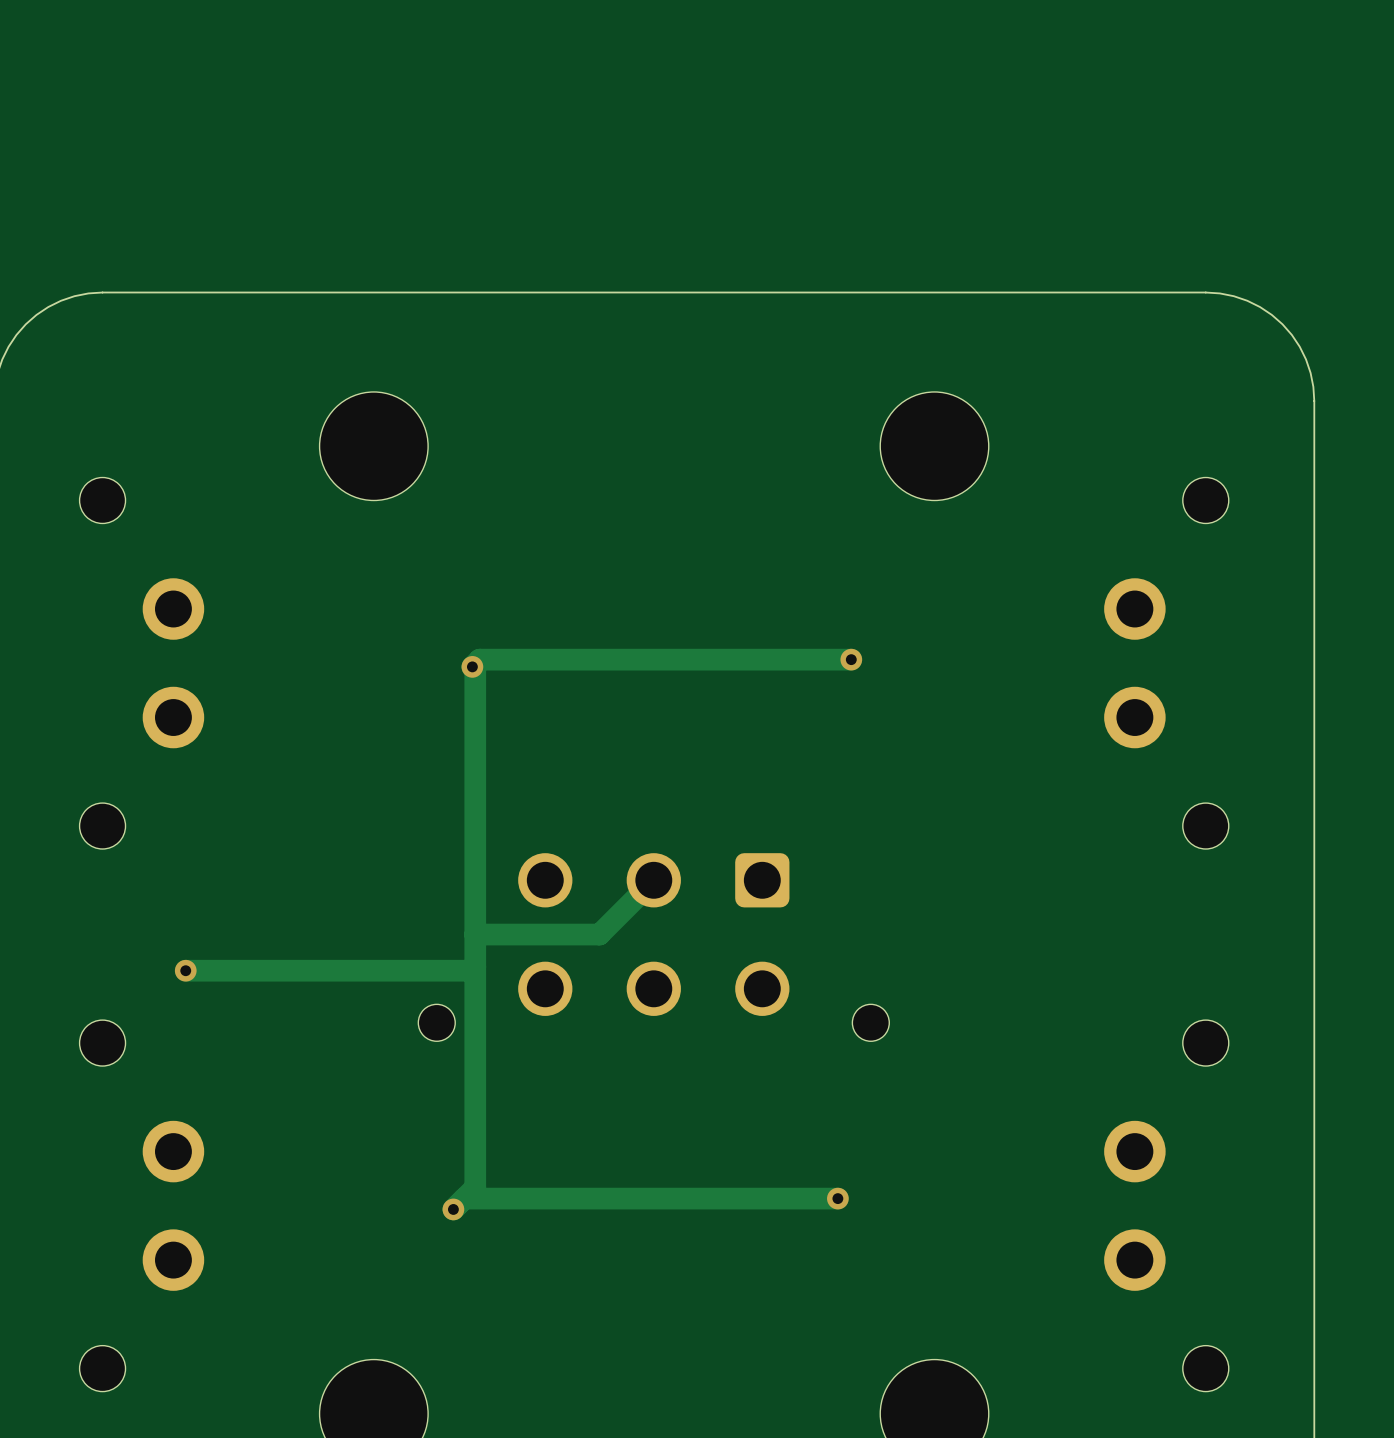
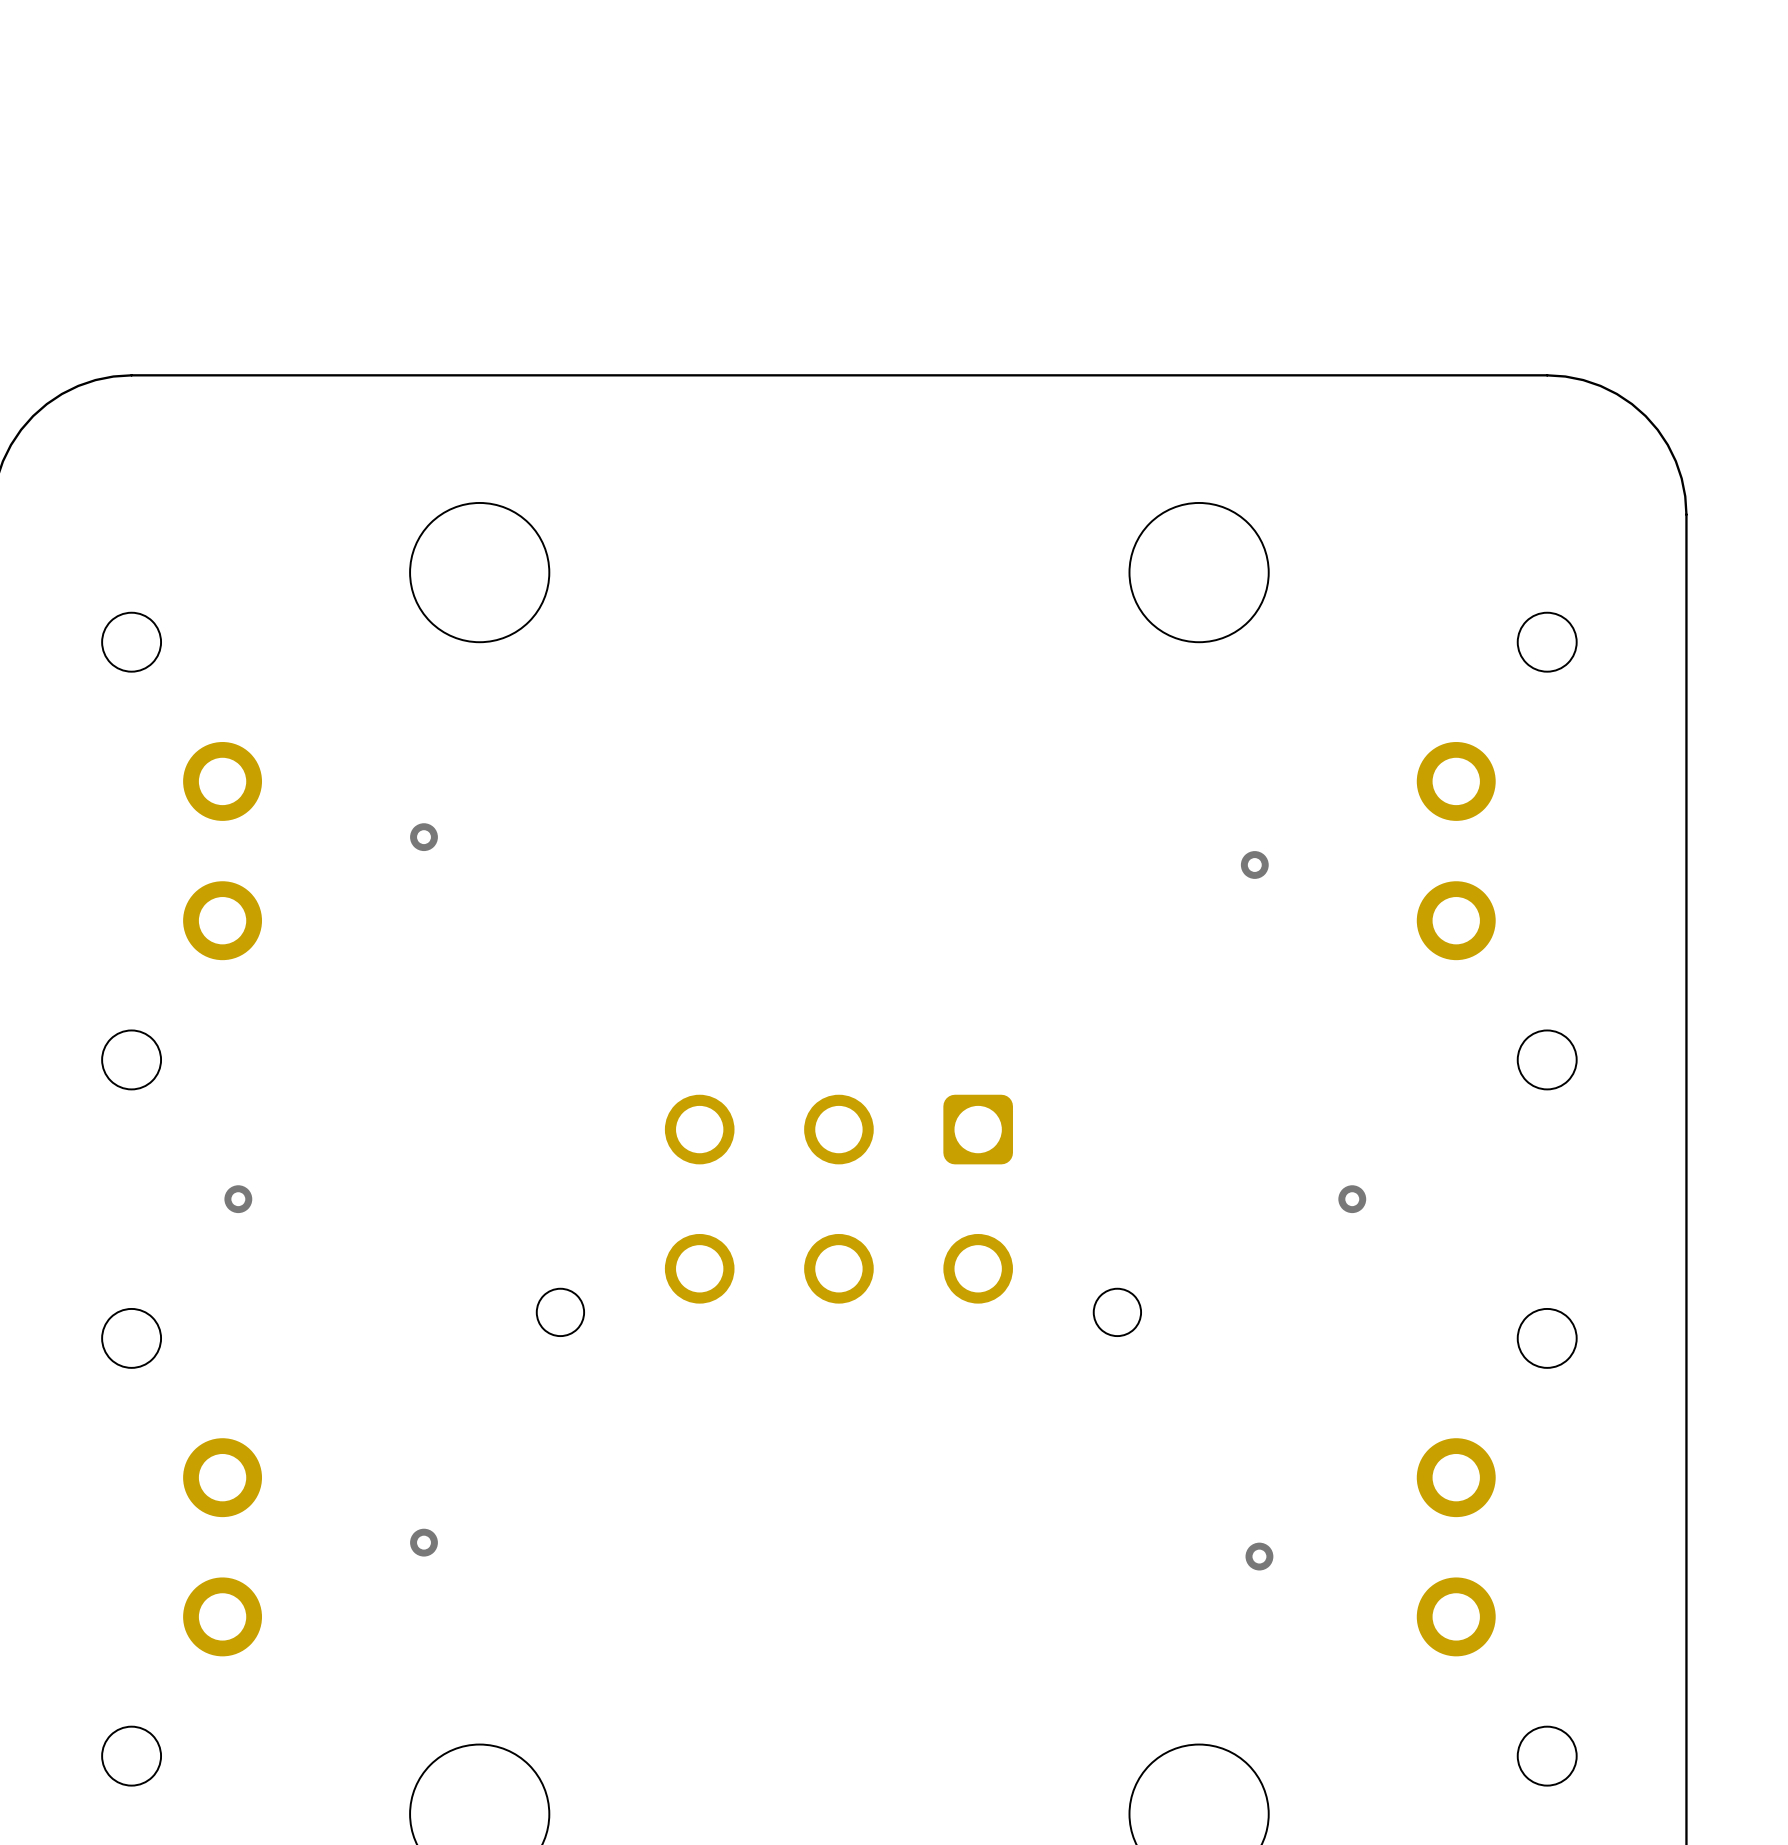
track: (851, 659) (479, 659) (472, 666) (475, 669) (475, 1187) (453, 1209) -> none
via position: (851, 659) -> (1254, 865)
via position: (472, 666) -> (423, 837)
track: (653, 880) (599, 934) (475, 934) -> none
via: none -> (1352, 1199)
track: (475, 967) (471, 970) (185, 970) -> none
via position: (185, 970) -> (238, 1199)
track: (837, 1198) (464, 1198) -> none
via position: (837, 1198) -> (1259, 1556)
via position: (453, 1209) -> (423, 1542)

